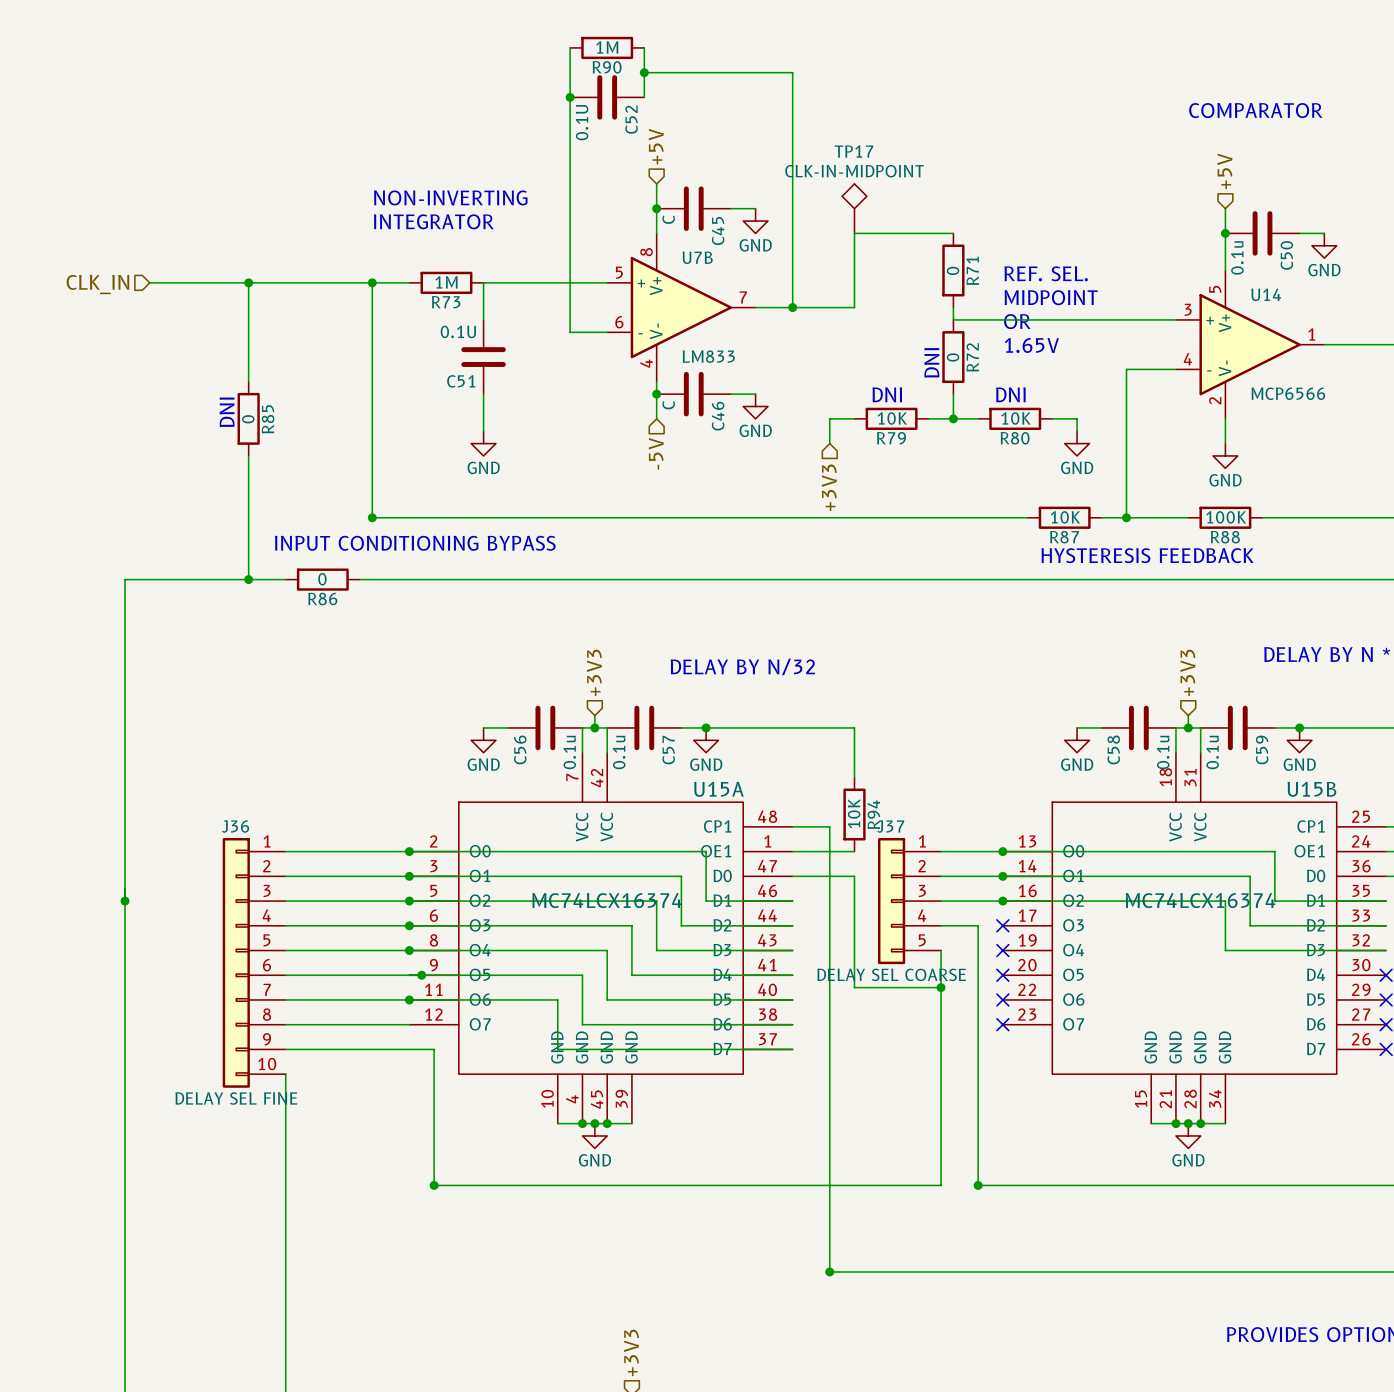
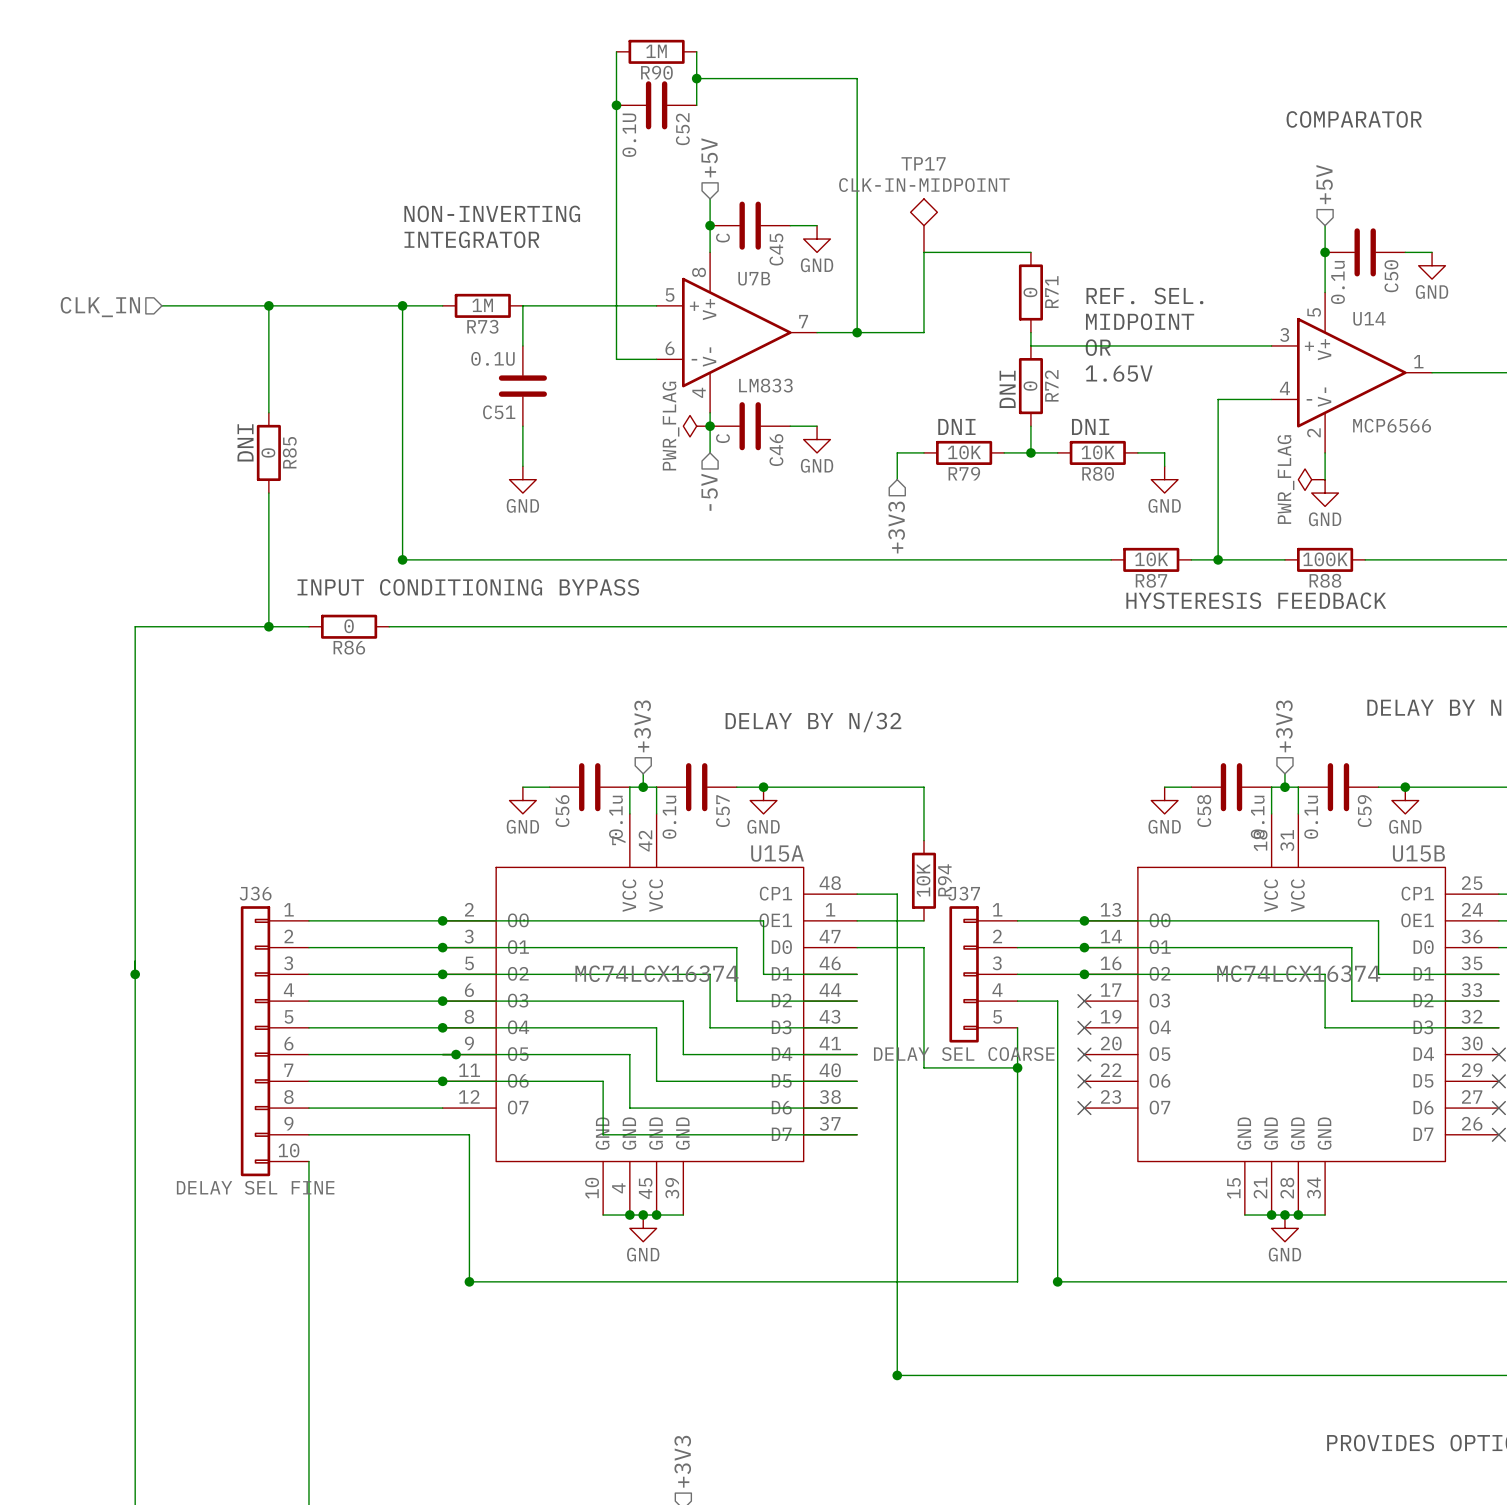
power symbol: none -> PWR_FLAG (696, 426)
power symbol: none -> PWR_FLAG (1311, 479)

